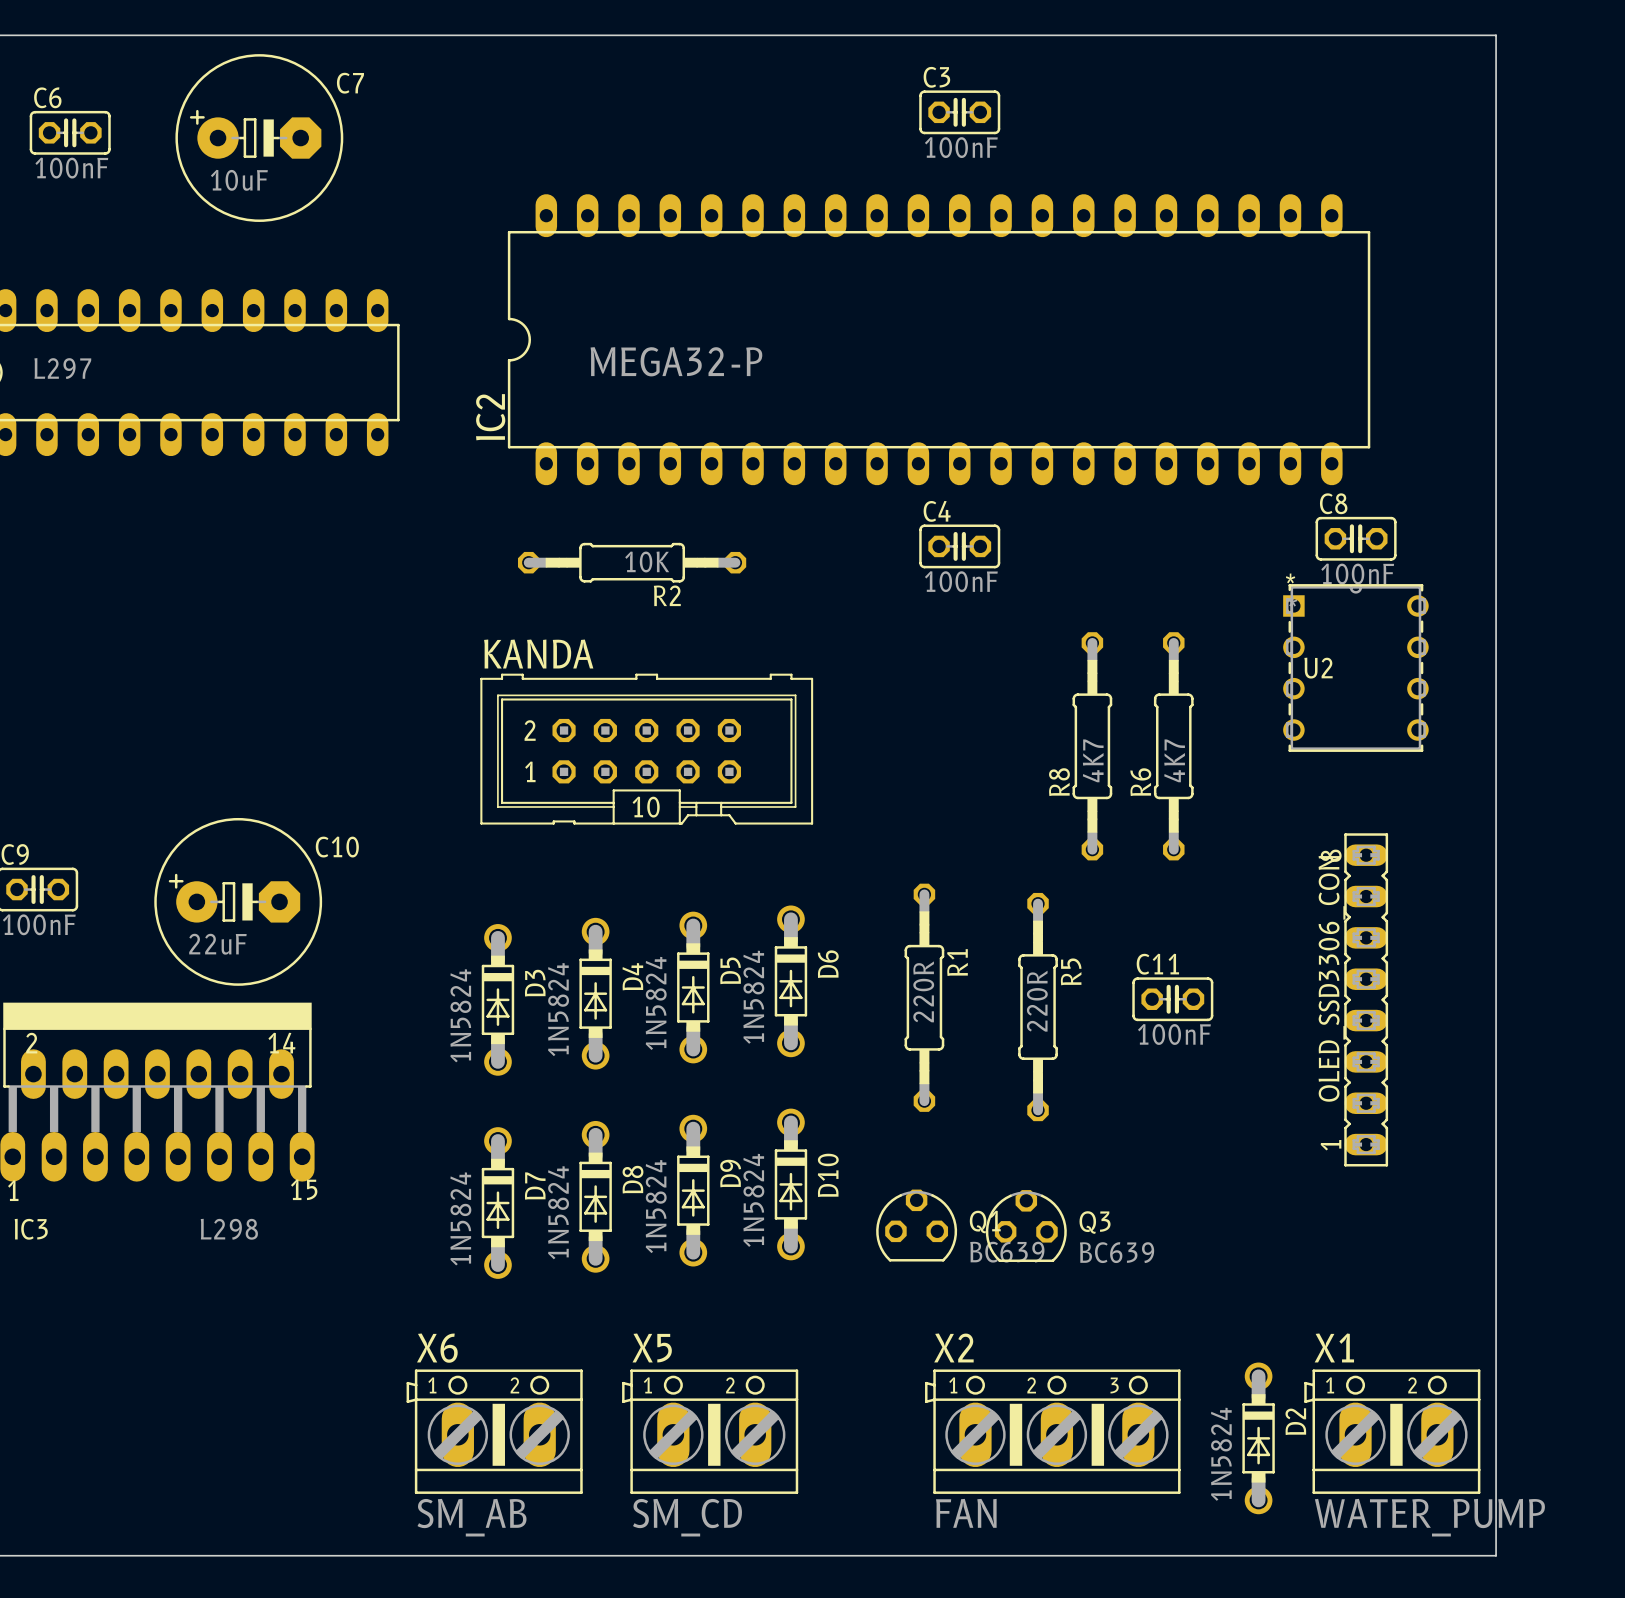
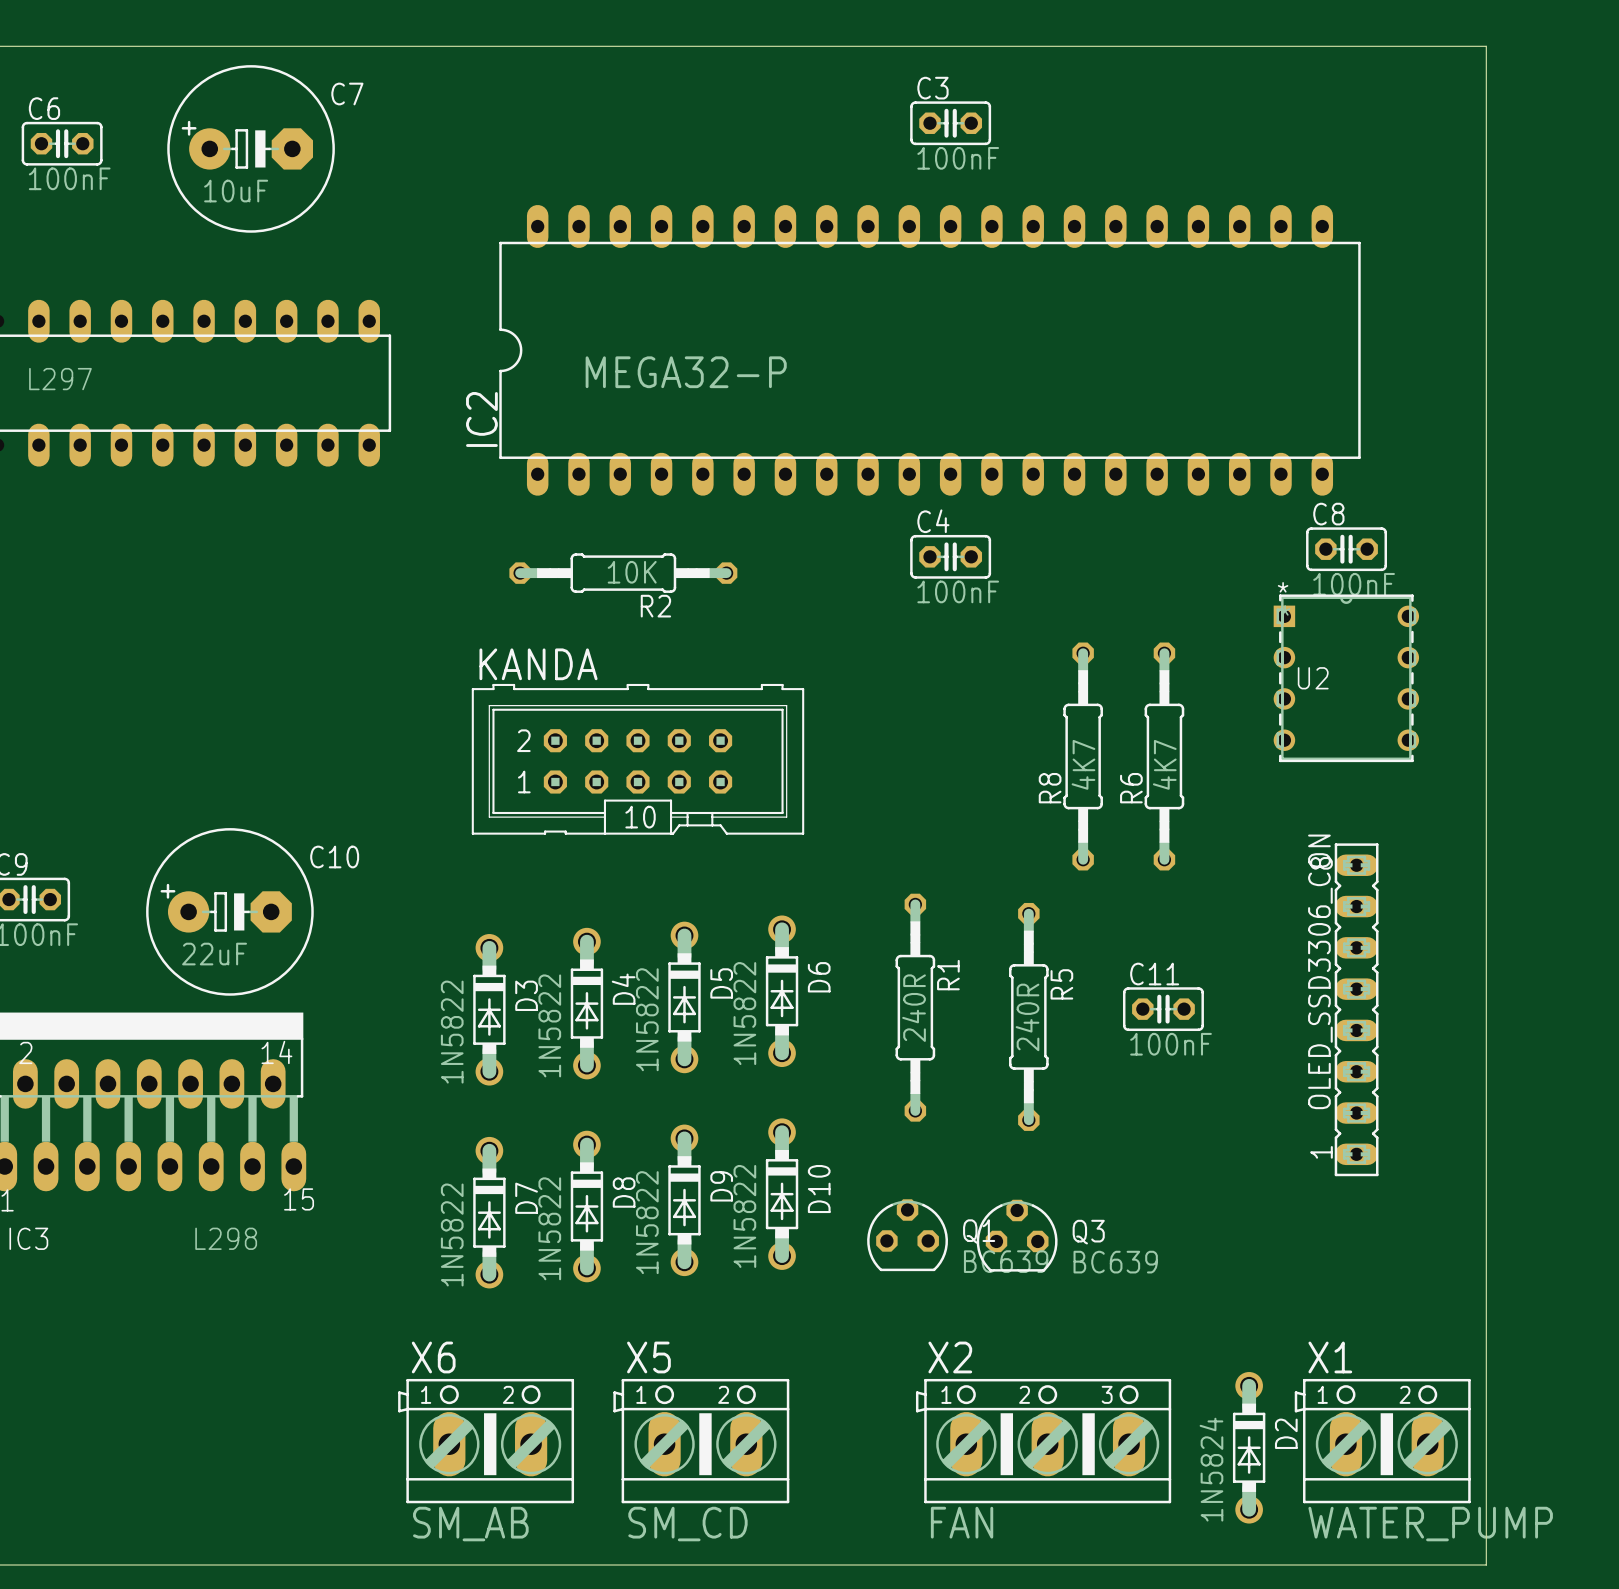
R1 value: 220R (923, 991) -> 240R (914, 1008)
D6 value: 1N5824 (753, 997) -> 1N5822 (744, 1013)
R5 value: 220R (1037, 1001) -> 240R (1027, 1017)
D5 value: 1N5824 (656, 1003) -> 1N5822 (647, 1019)
D4 value: 1N5824 (558, 1009) -> 1N5822 (549, 1025)
D3 value: 1N5824 (460, 1015) -> 1N5822 (452, 1032)
D10 value: 1N5824 (753, 1200) -> 1N5822 (744, 1216)
D9 value: 1N5824 (656, 1206) -> 1N5822 (647, 1222)
D8 value: 1N5824 (558, 1212) -> 1N5822 (549, 1228)
D7 value: 1N5824 (460, 1218) -> 1N5822 (452, 1234)

